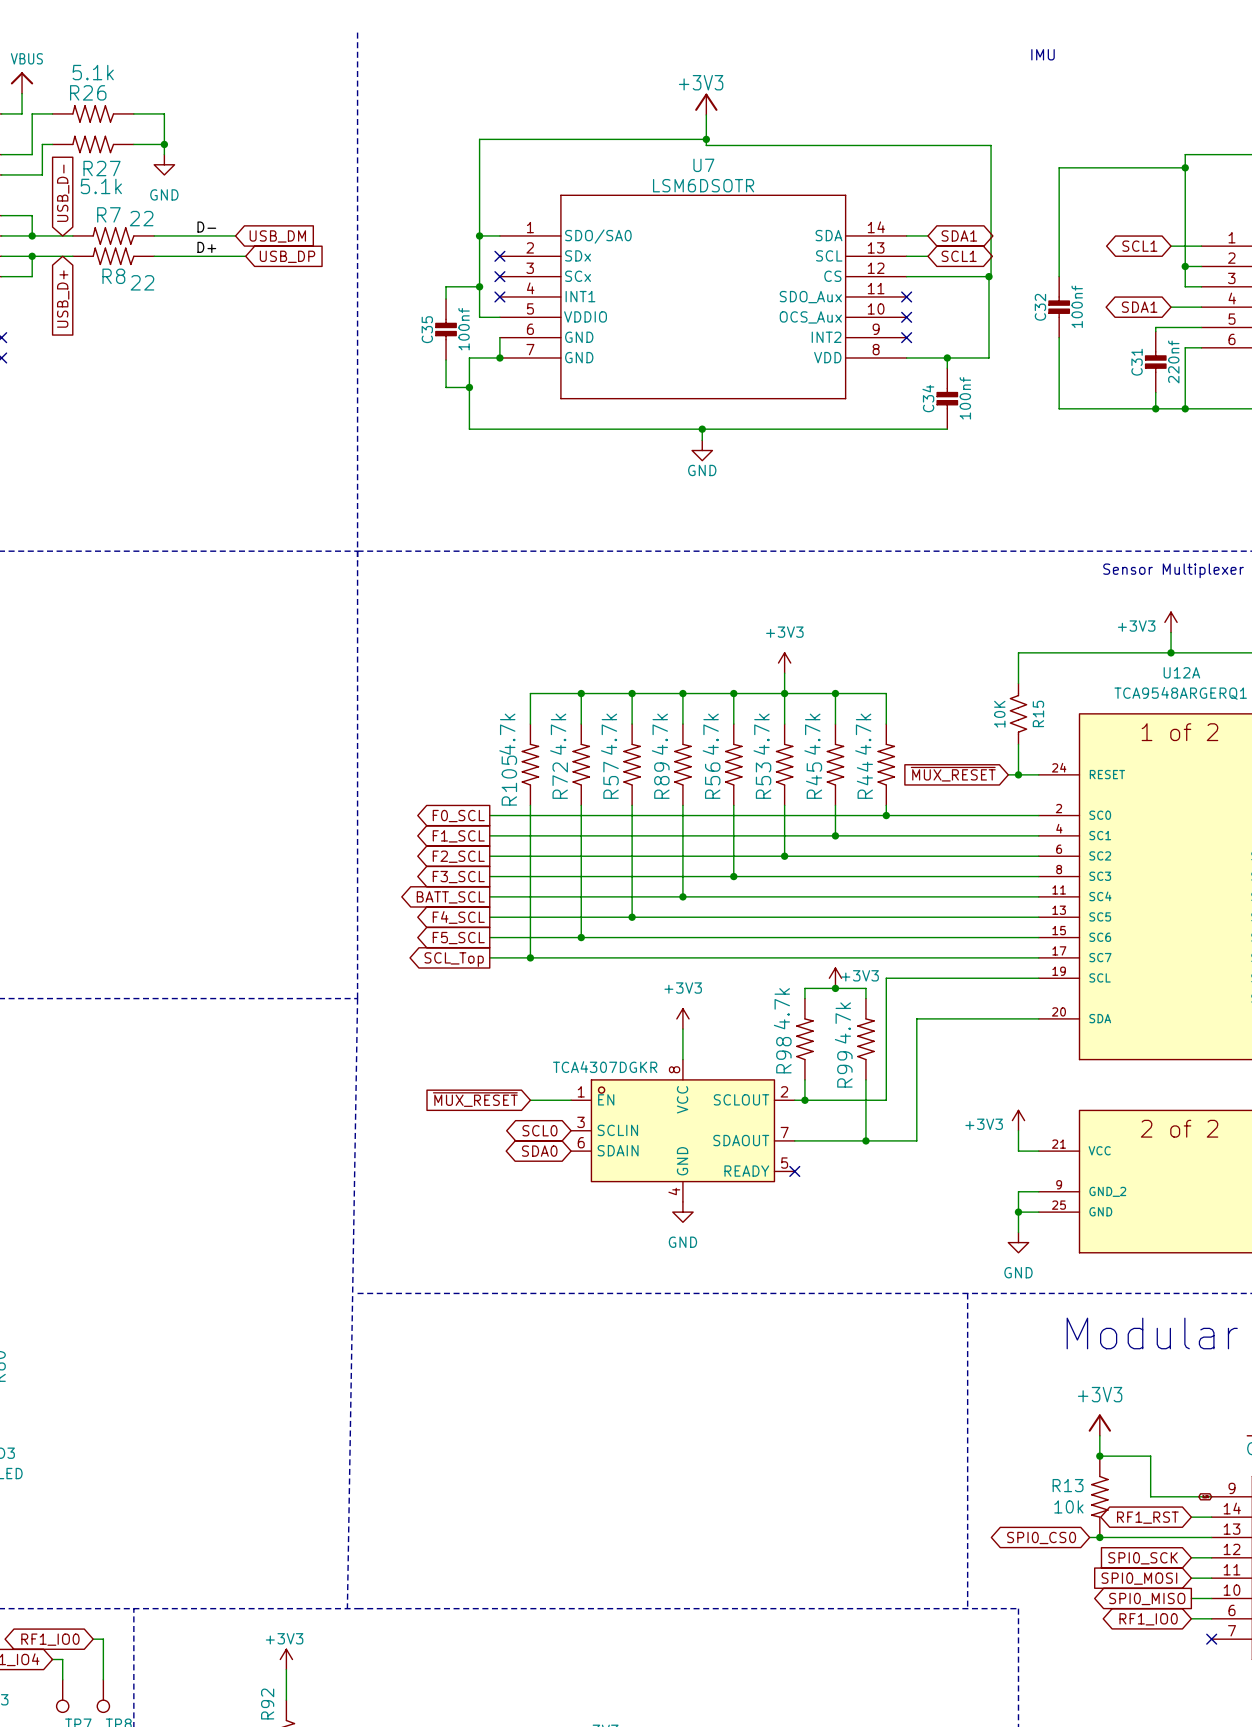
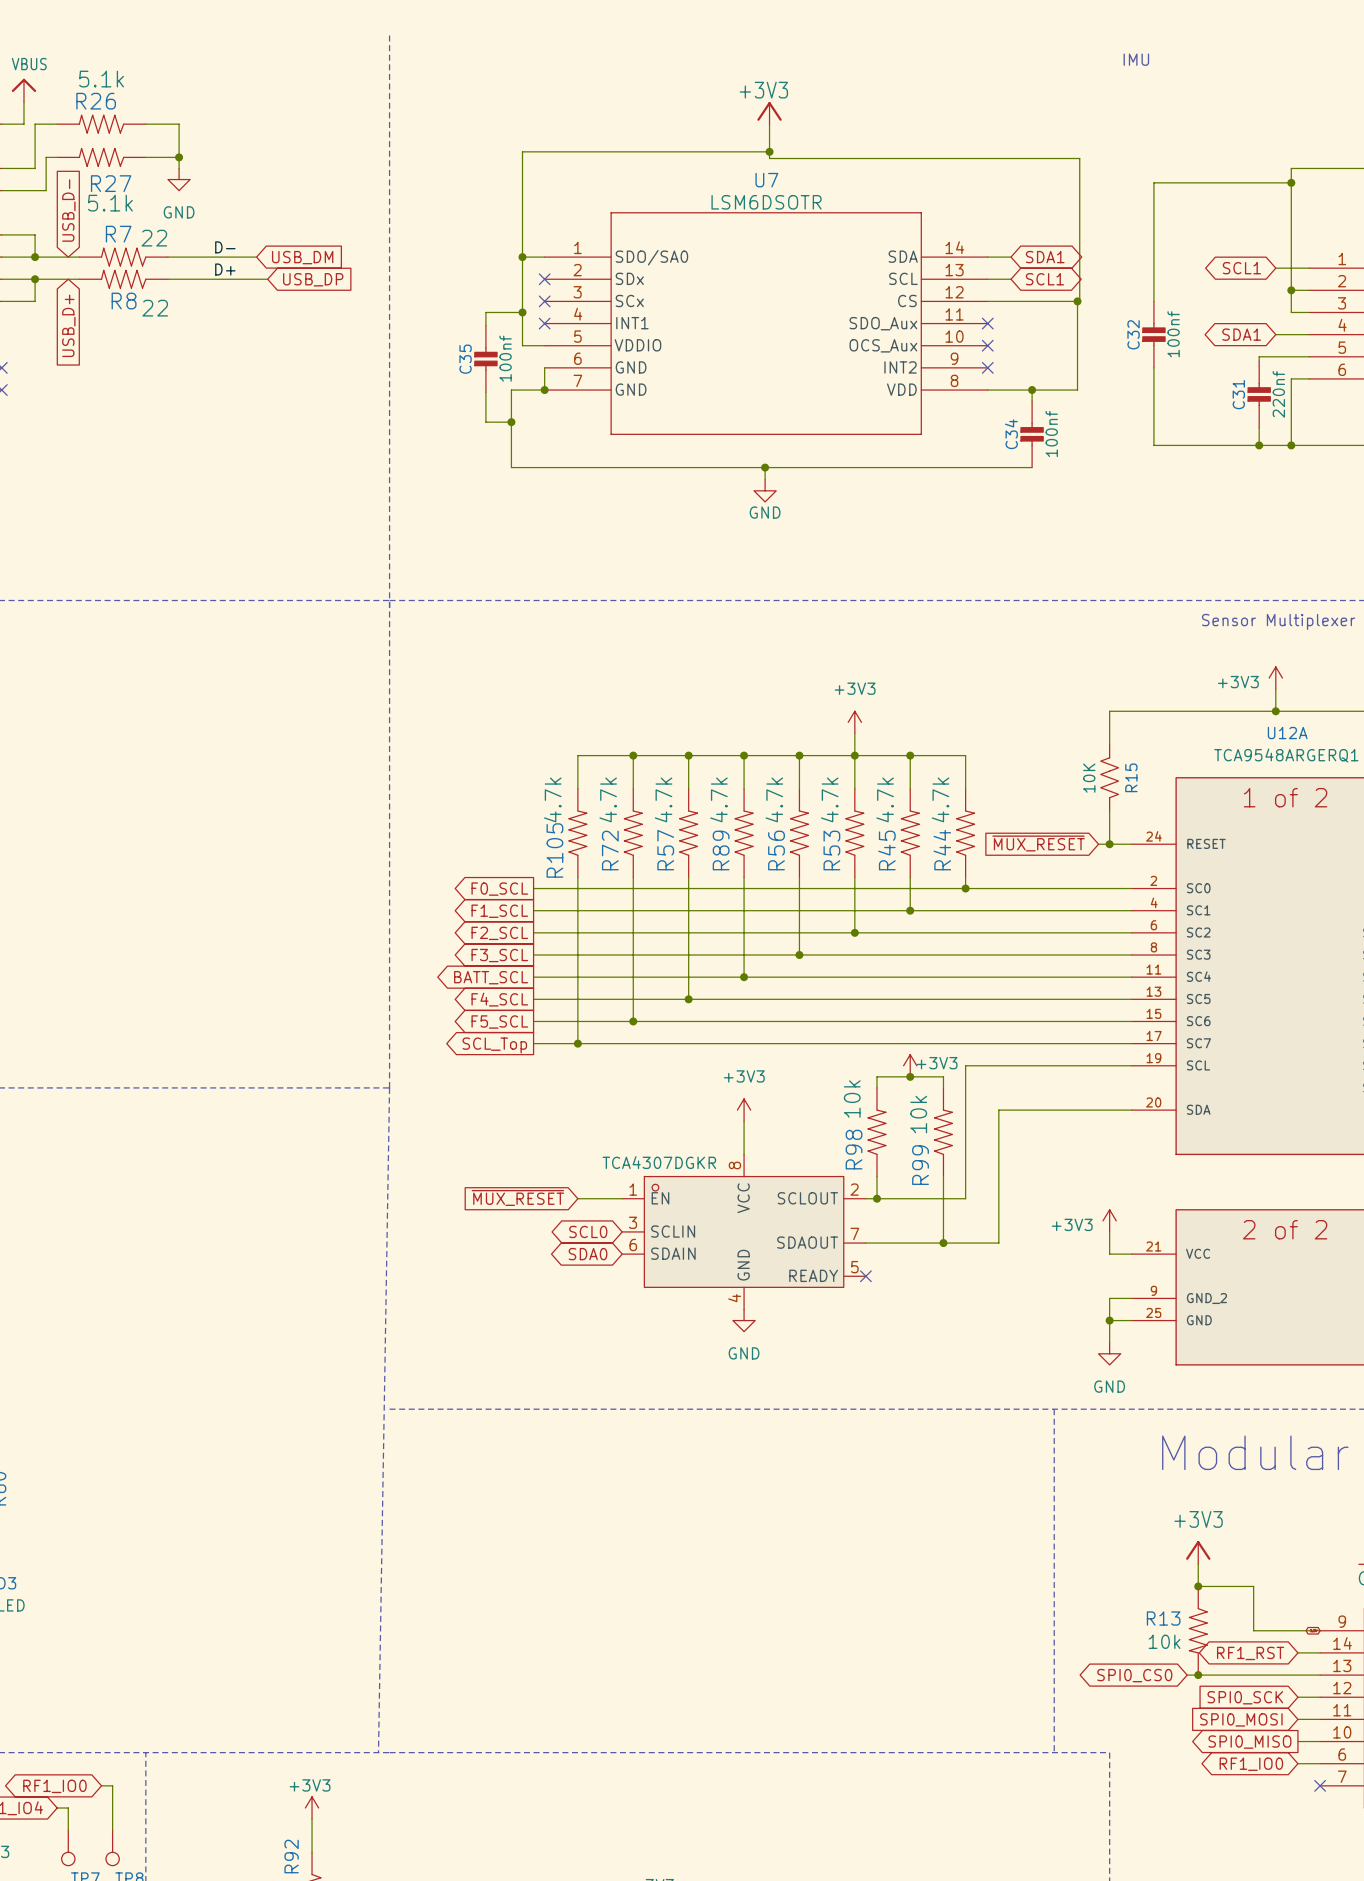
R98 value: 4.7k (781, 1008) -> 10k (852, 1099)
R99 value: 4.7k (842, 1022) -> 10k (918, 1114)

